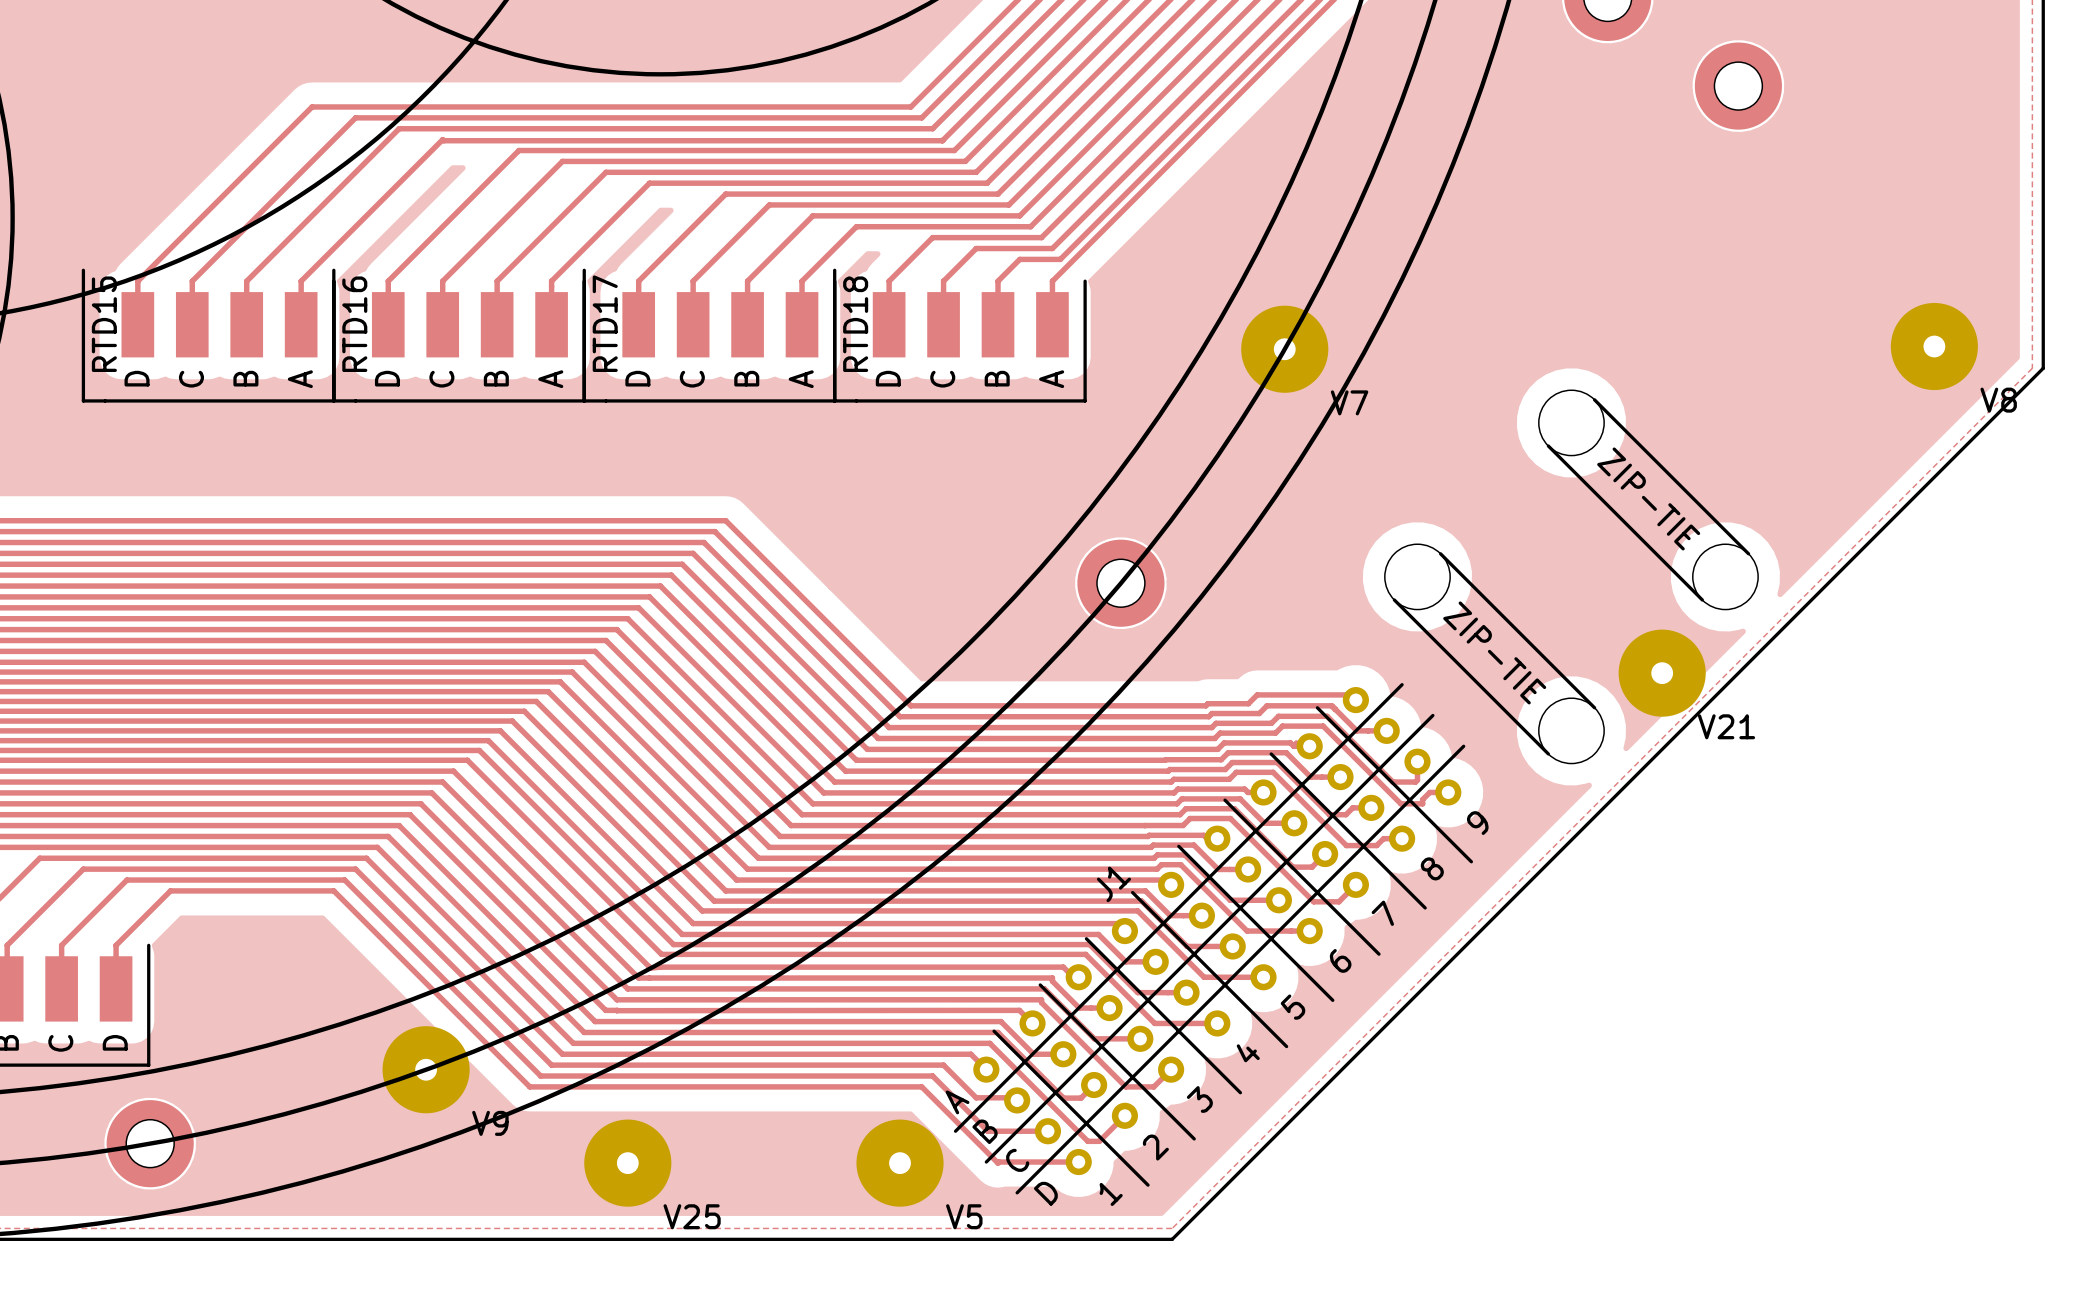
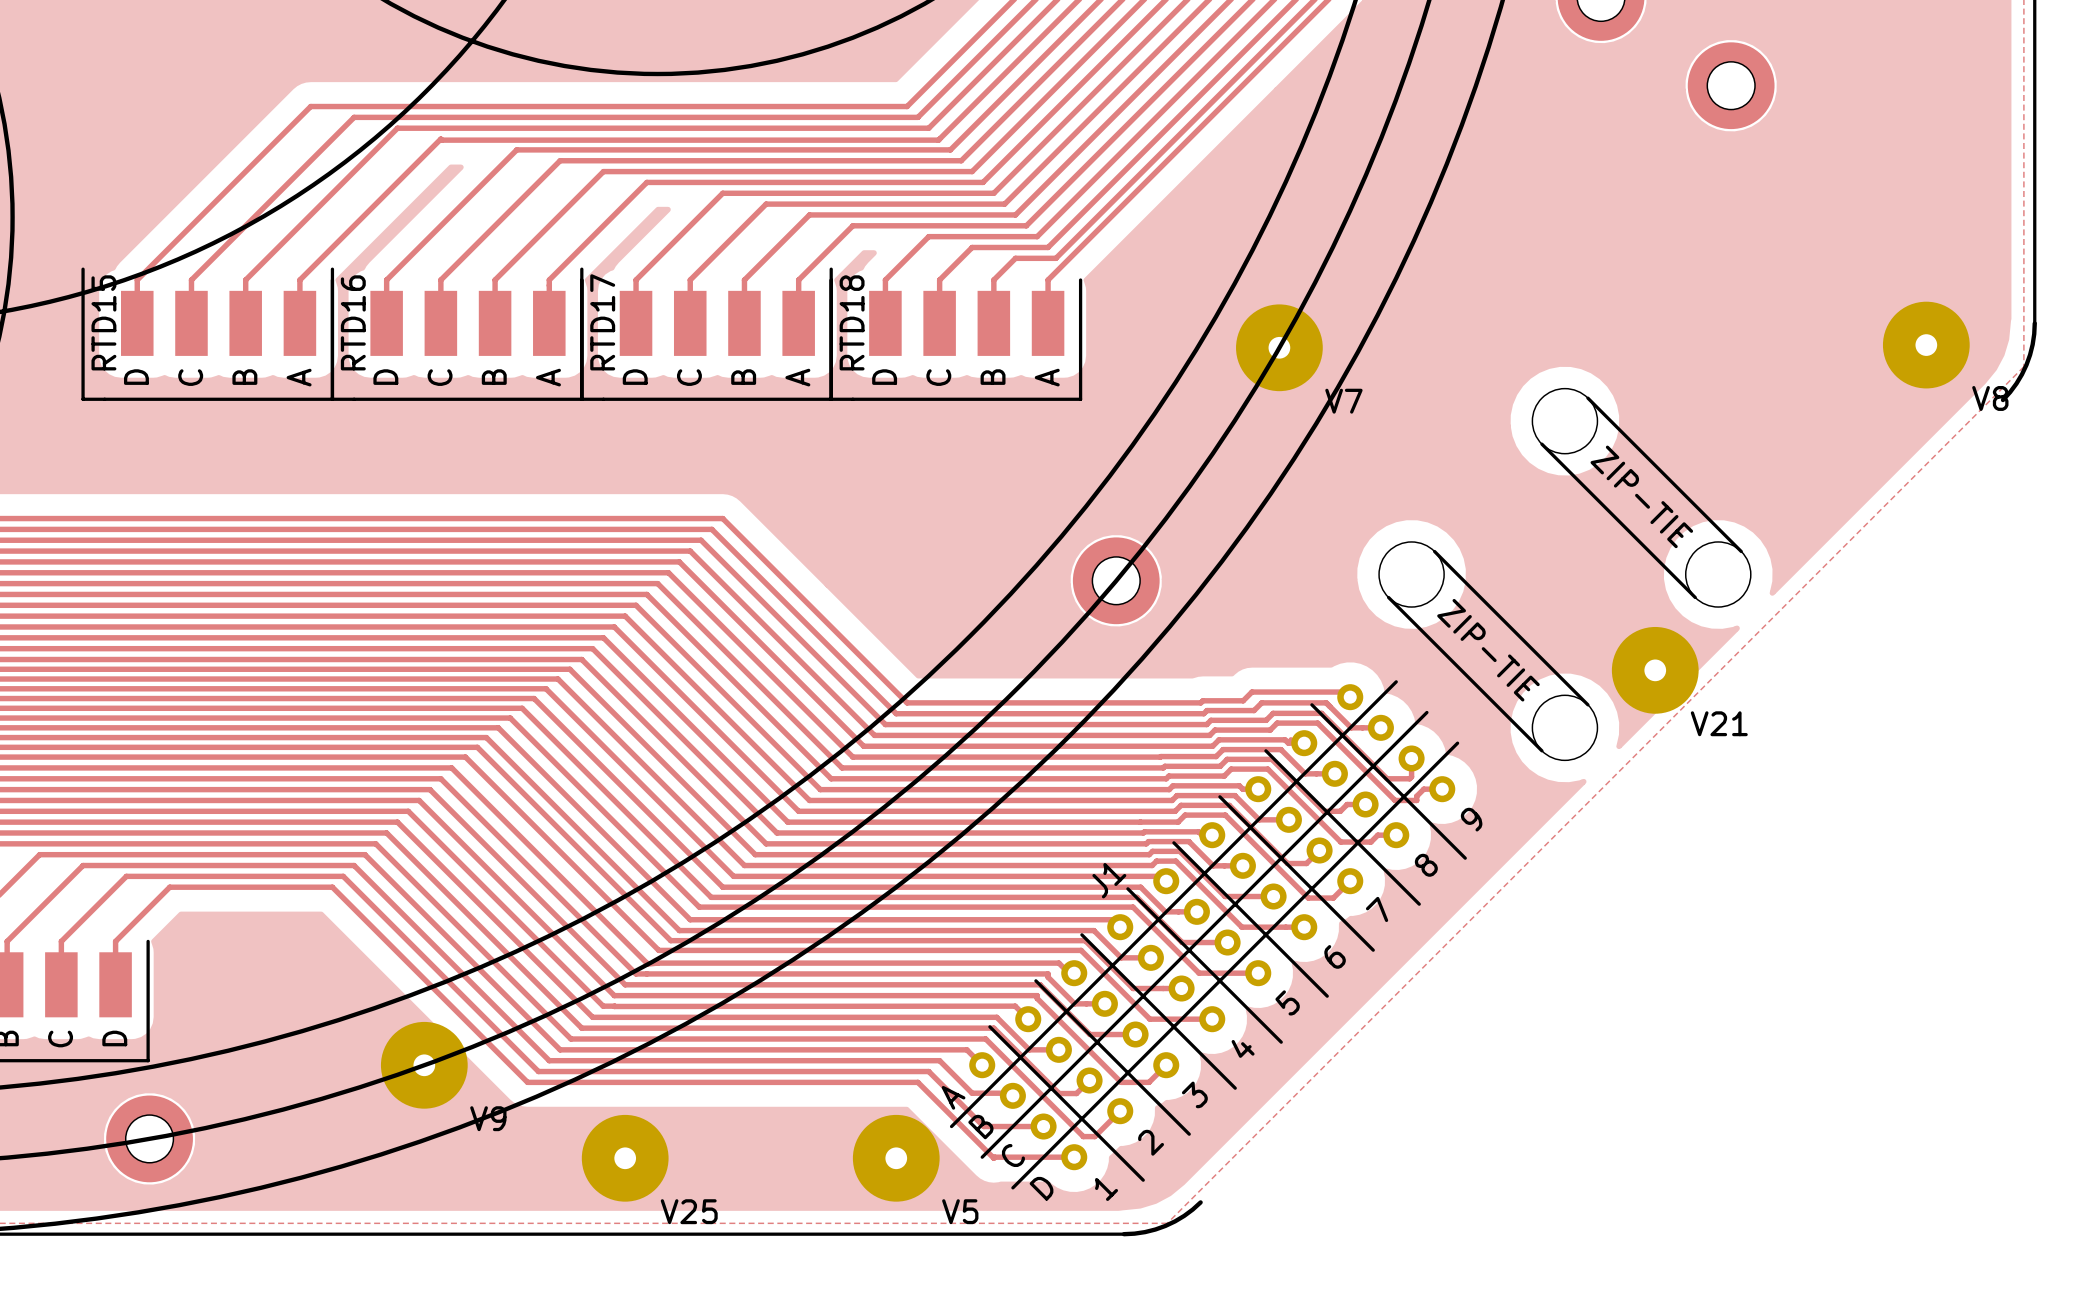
board edge: (2043, 324) (2043, 368) (1172, 1239) (1128, 1239) -> (2034, 323) (2032, 344) (2026, 364) (2016, 383) (2002, 400)
board edge: none -> (1200, 1202) (1184, 1215) (1165, 1225) (1145, 1232) (1123, 1234)

